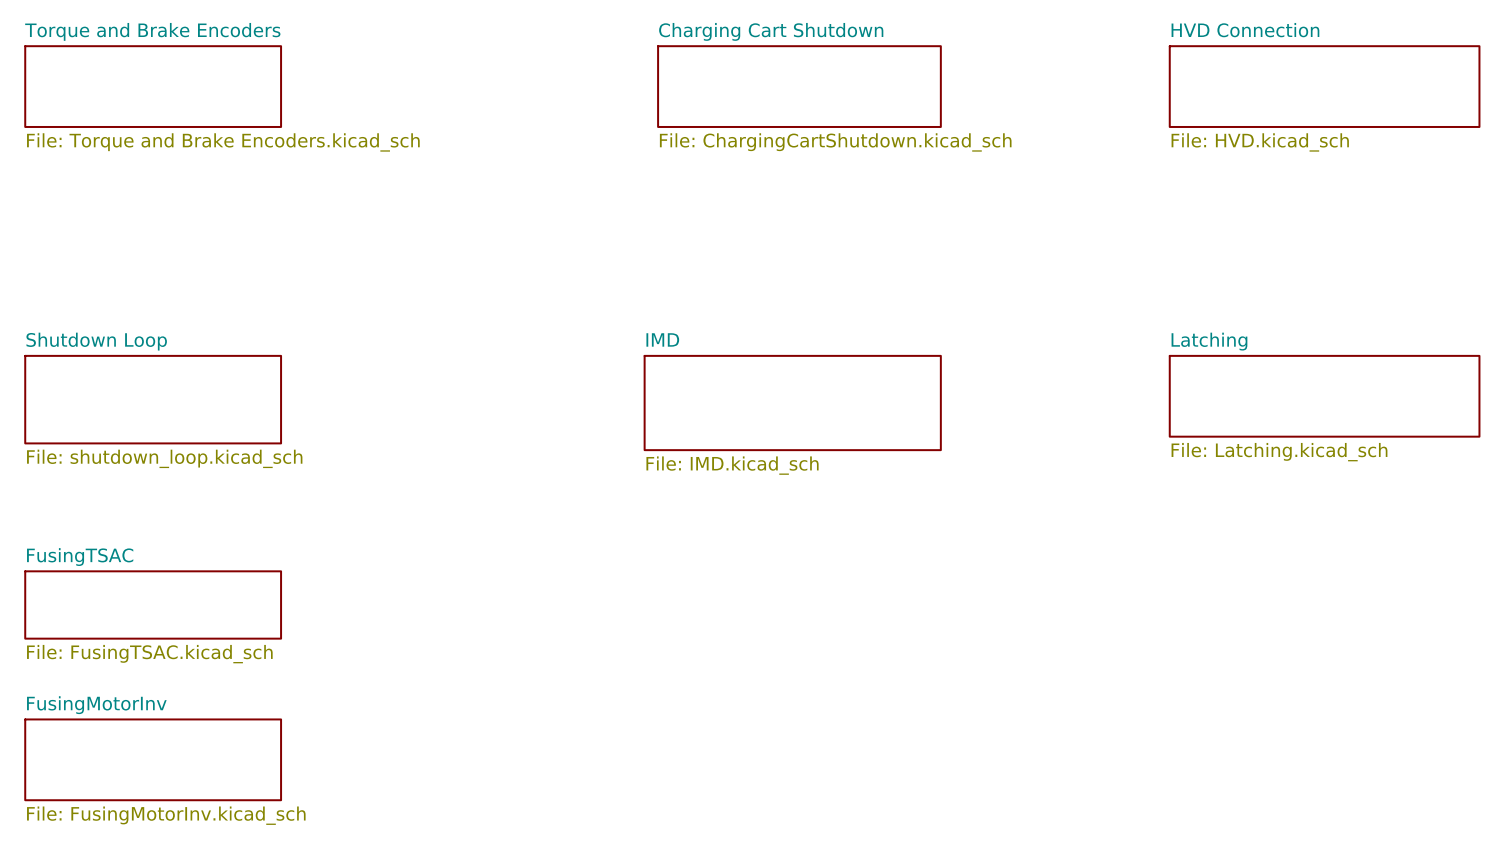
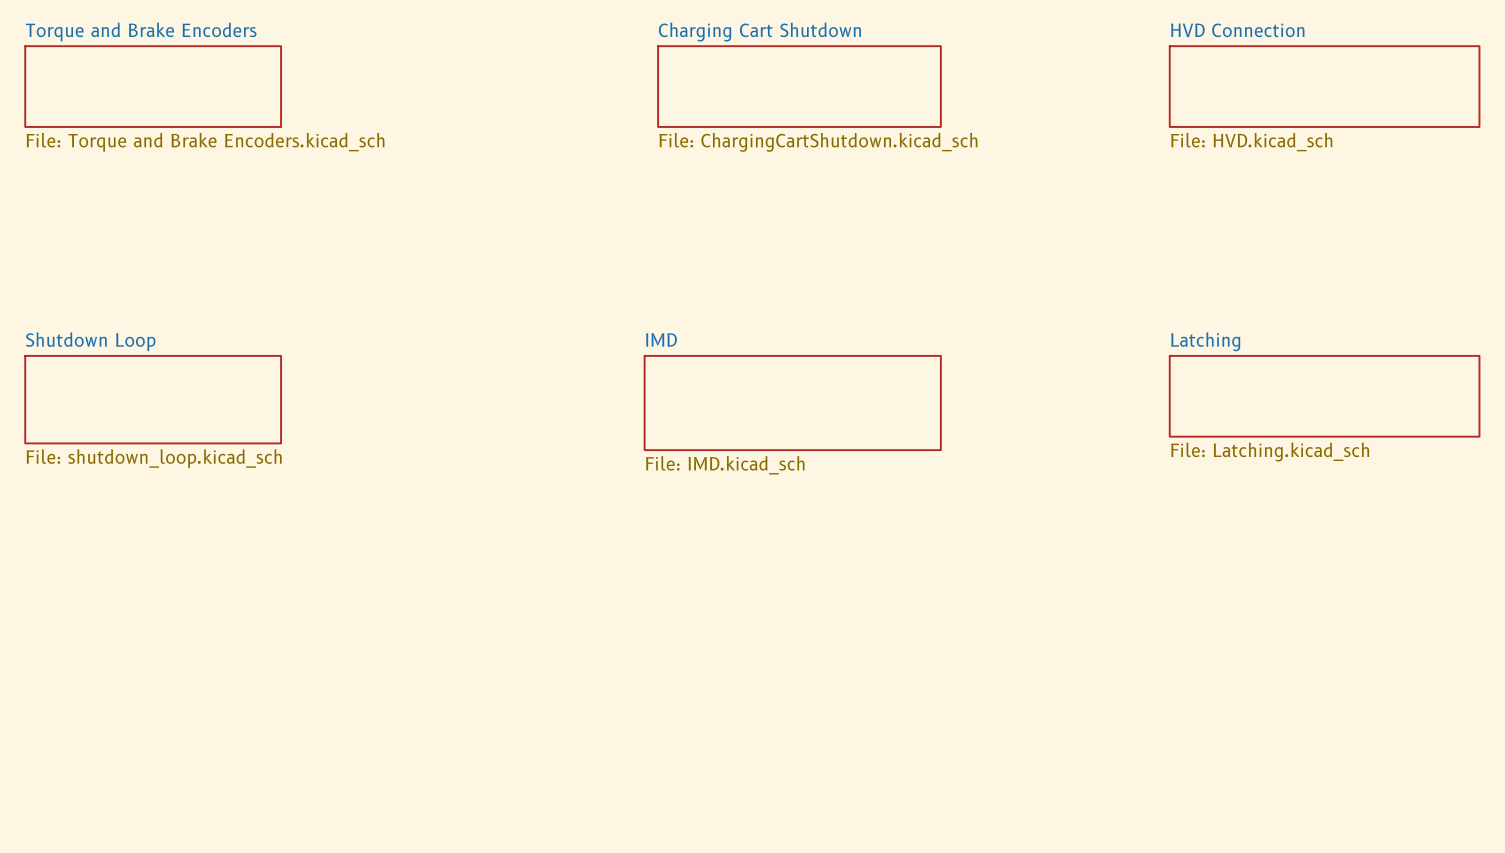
sheet FusingTSAC: File: FusingTSAC.kicad_sch (153, 604) -> none
sheet FusingMotorInv: File: FusingMotorInv.kicad_sch (153, 759) -> none

